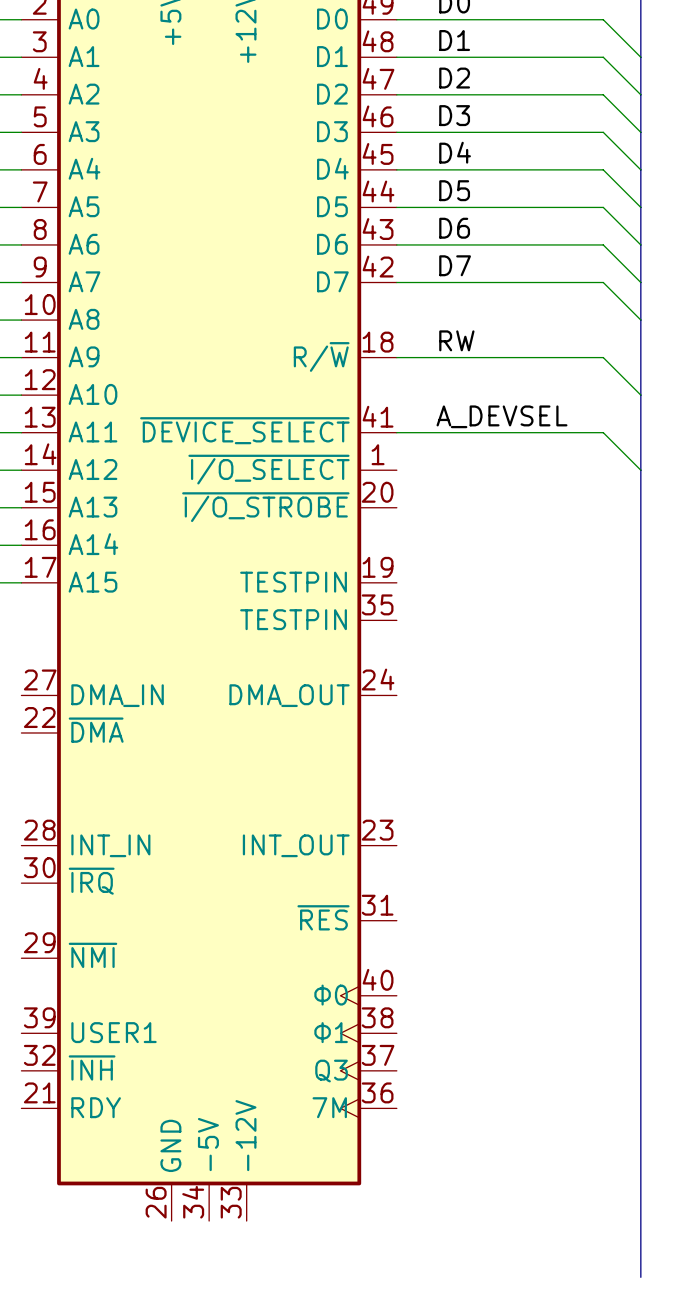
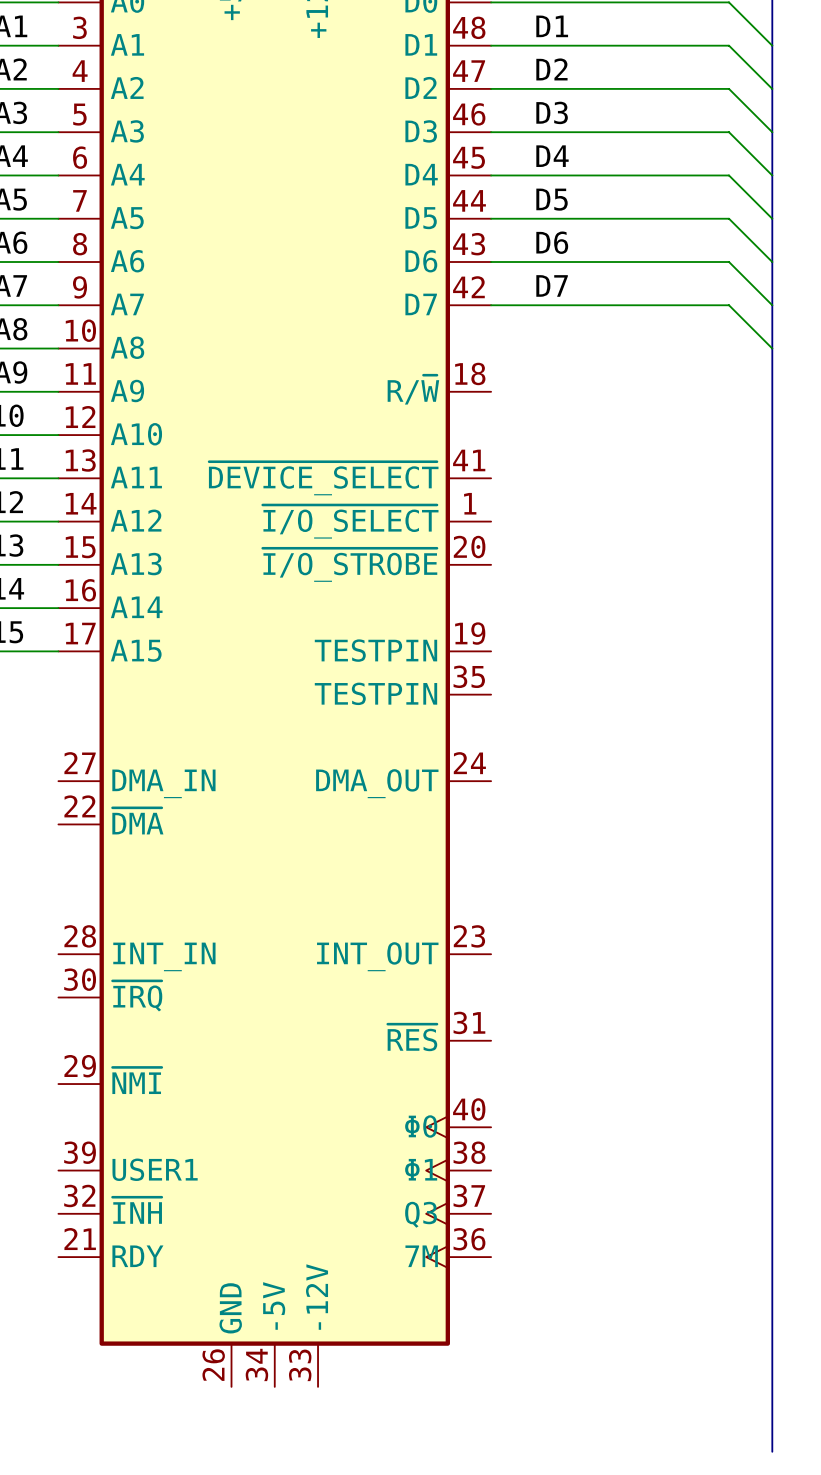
label: RW (456, 340) -> none
wire: (396, 357) (603, 357) (640, 395) -> none
label: A_DEVSEL (501, 416) -> none
wire: (396, 432) (603, 432) (640, 470) -> none

